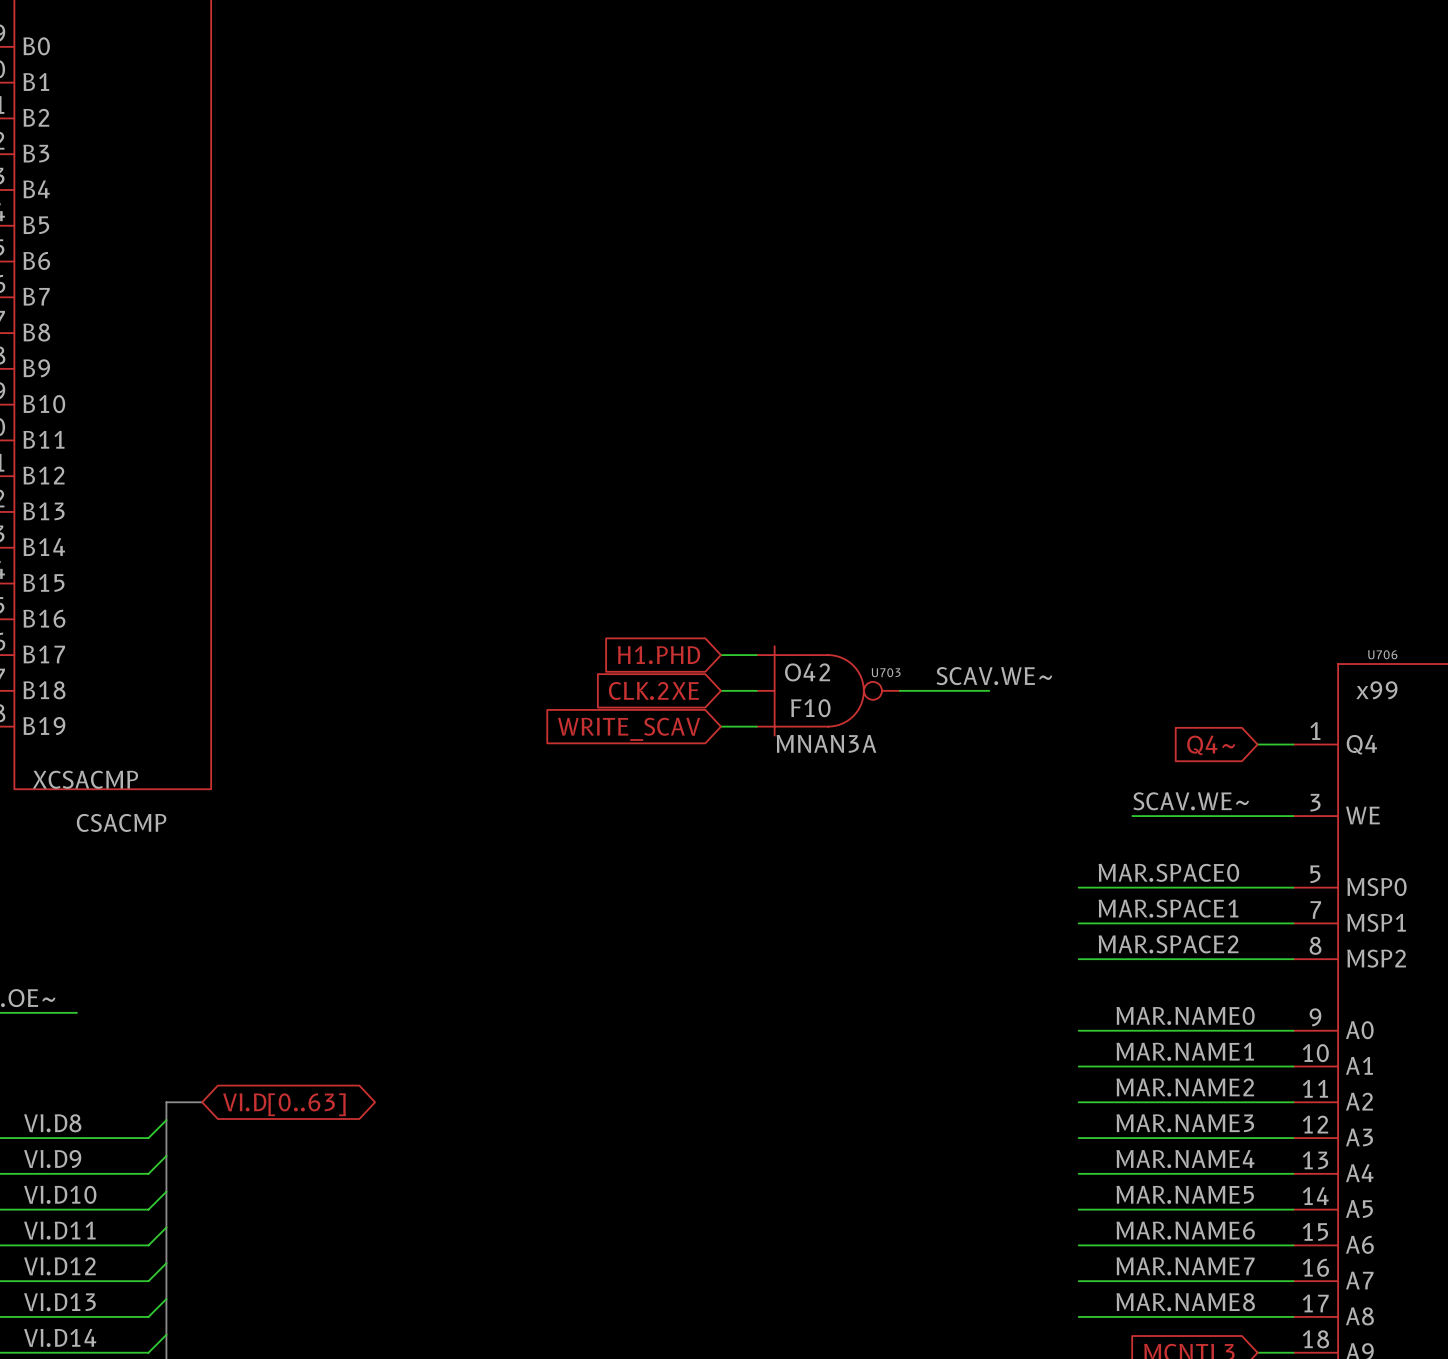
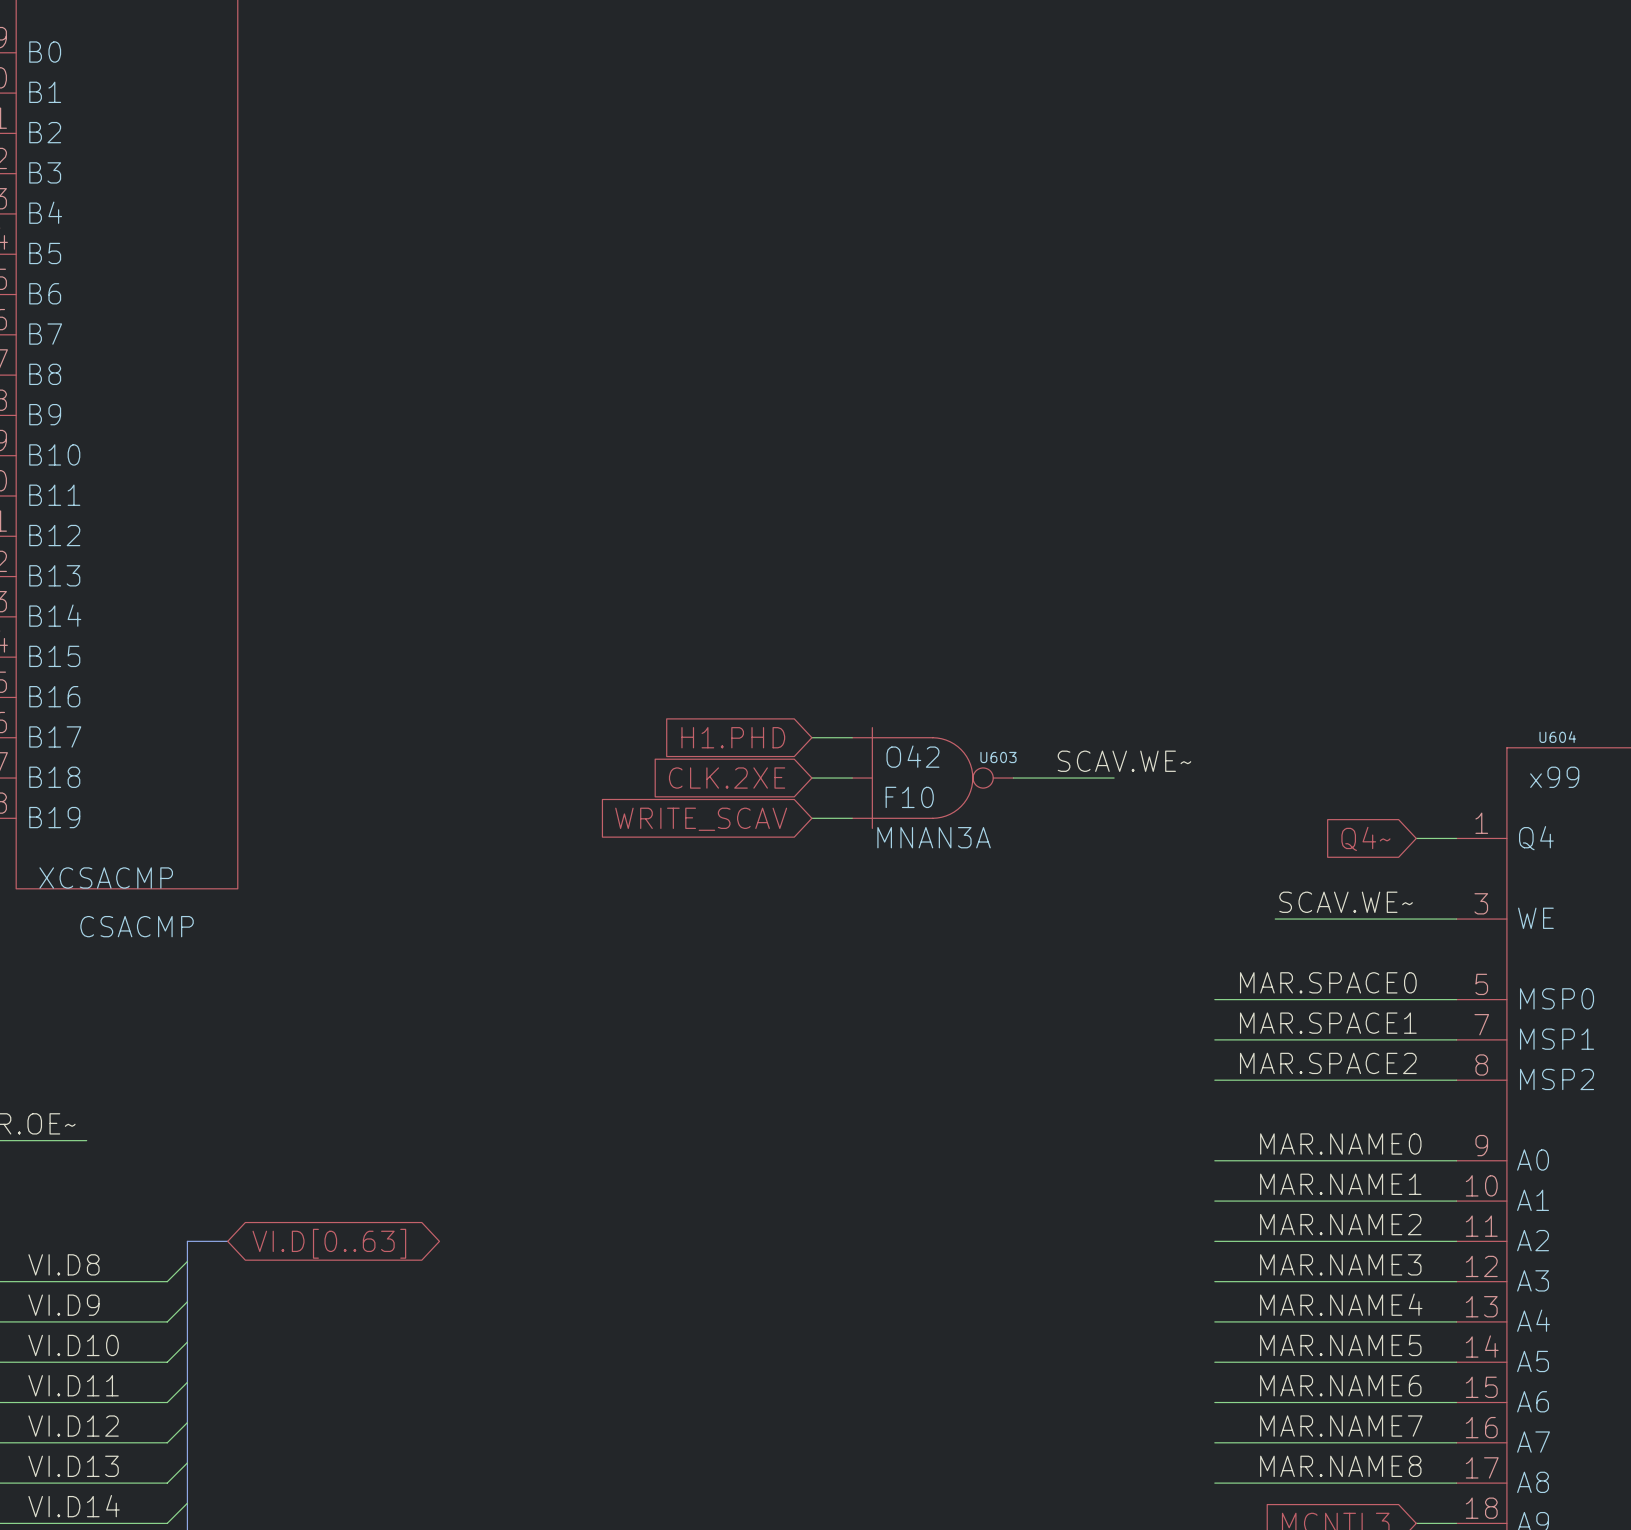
U706 name: U706 (1382, 654) -> U604 (1557, 737)
U703 name: U703 (886, 672) -> U603 (998, 757)

